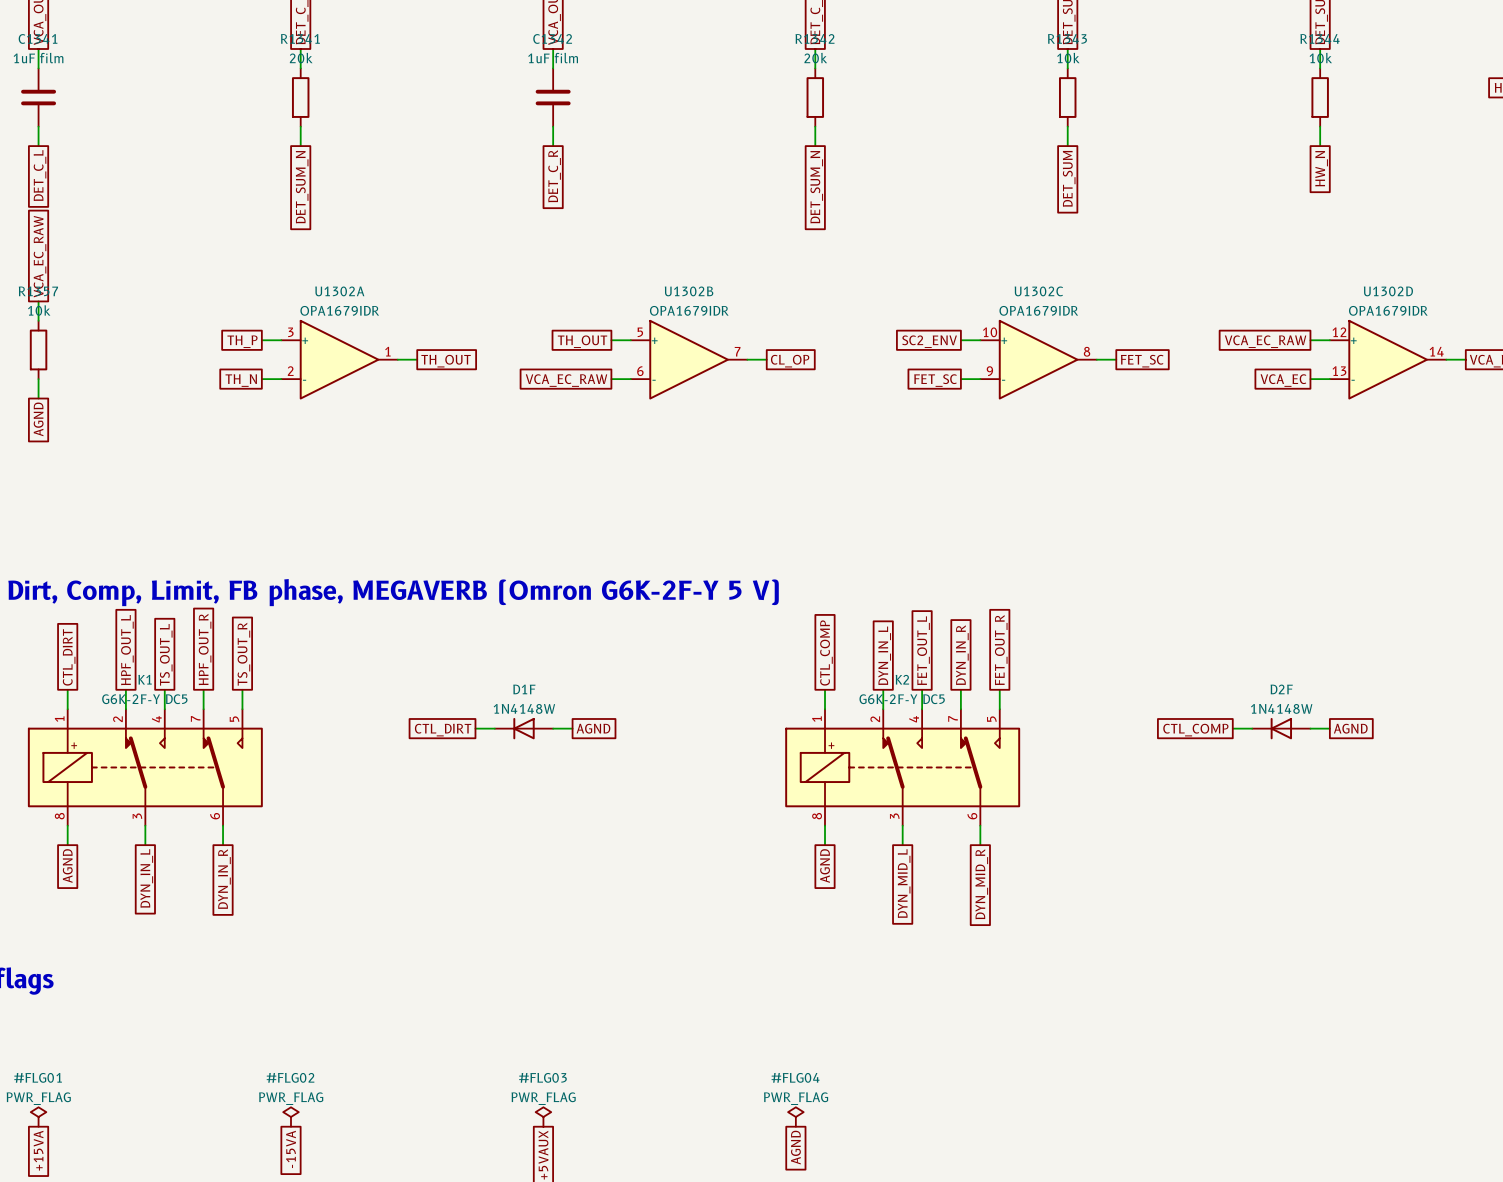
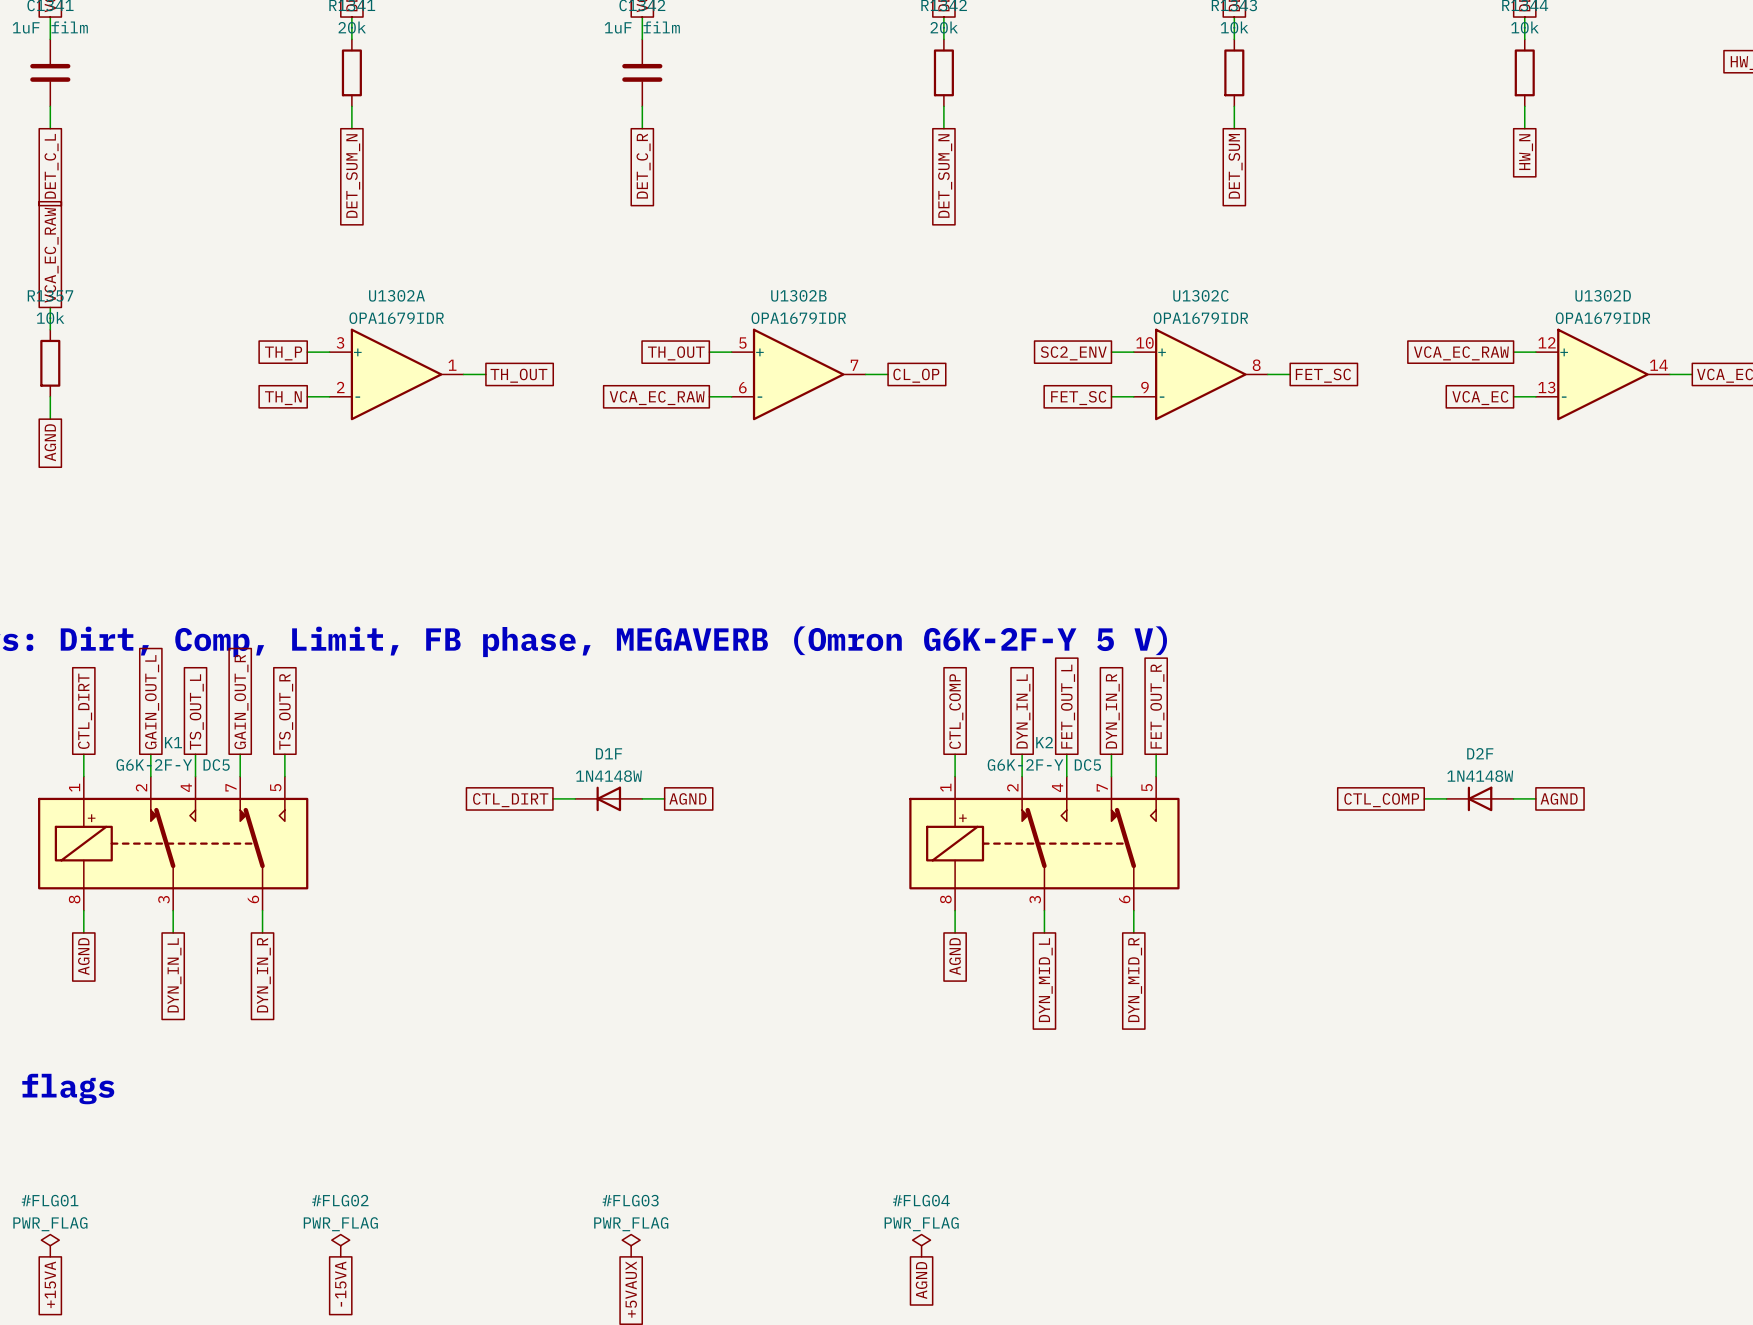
global label: HPF_OUT_R (205, 649) -> GAIN_OUT_R (241, 702)
global label: HPF_OUT_L (127, 650) -> GAIN_OUT_L (152, 702)

